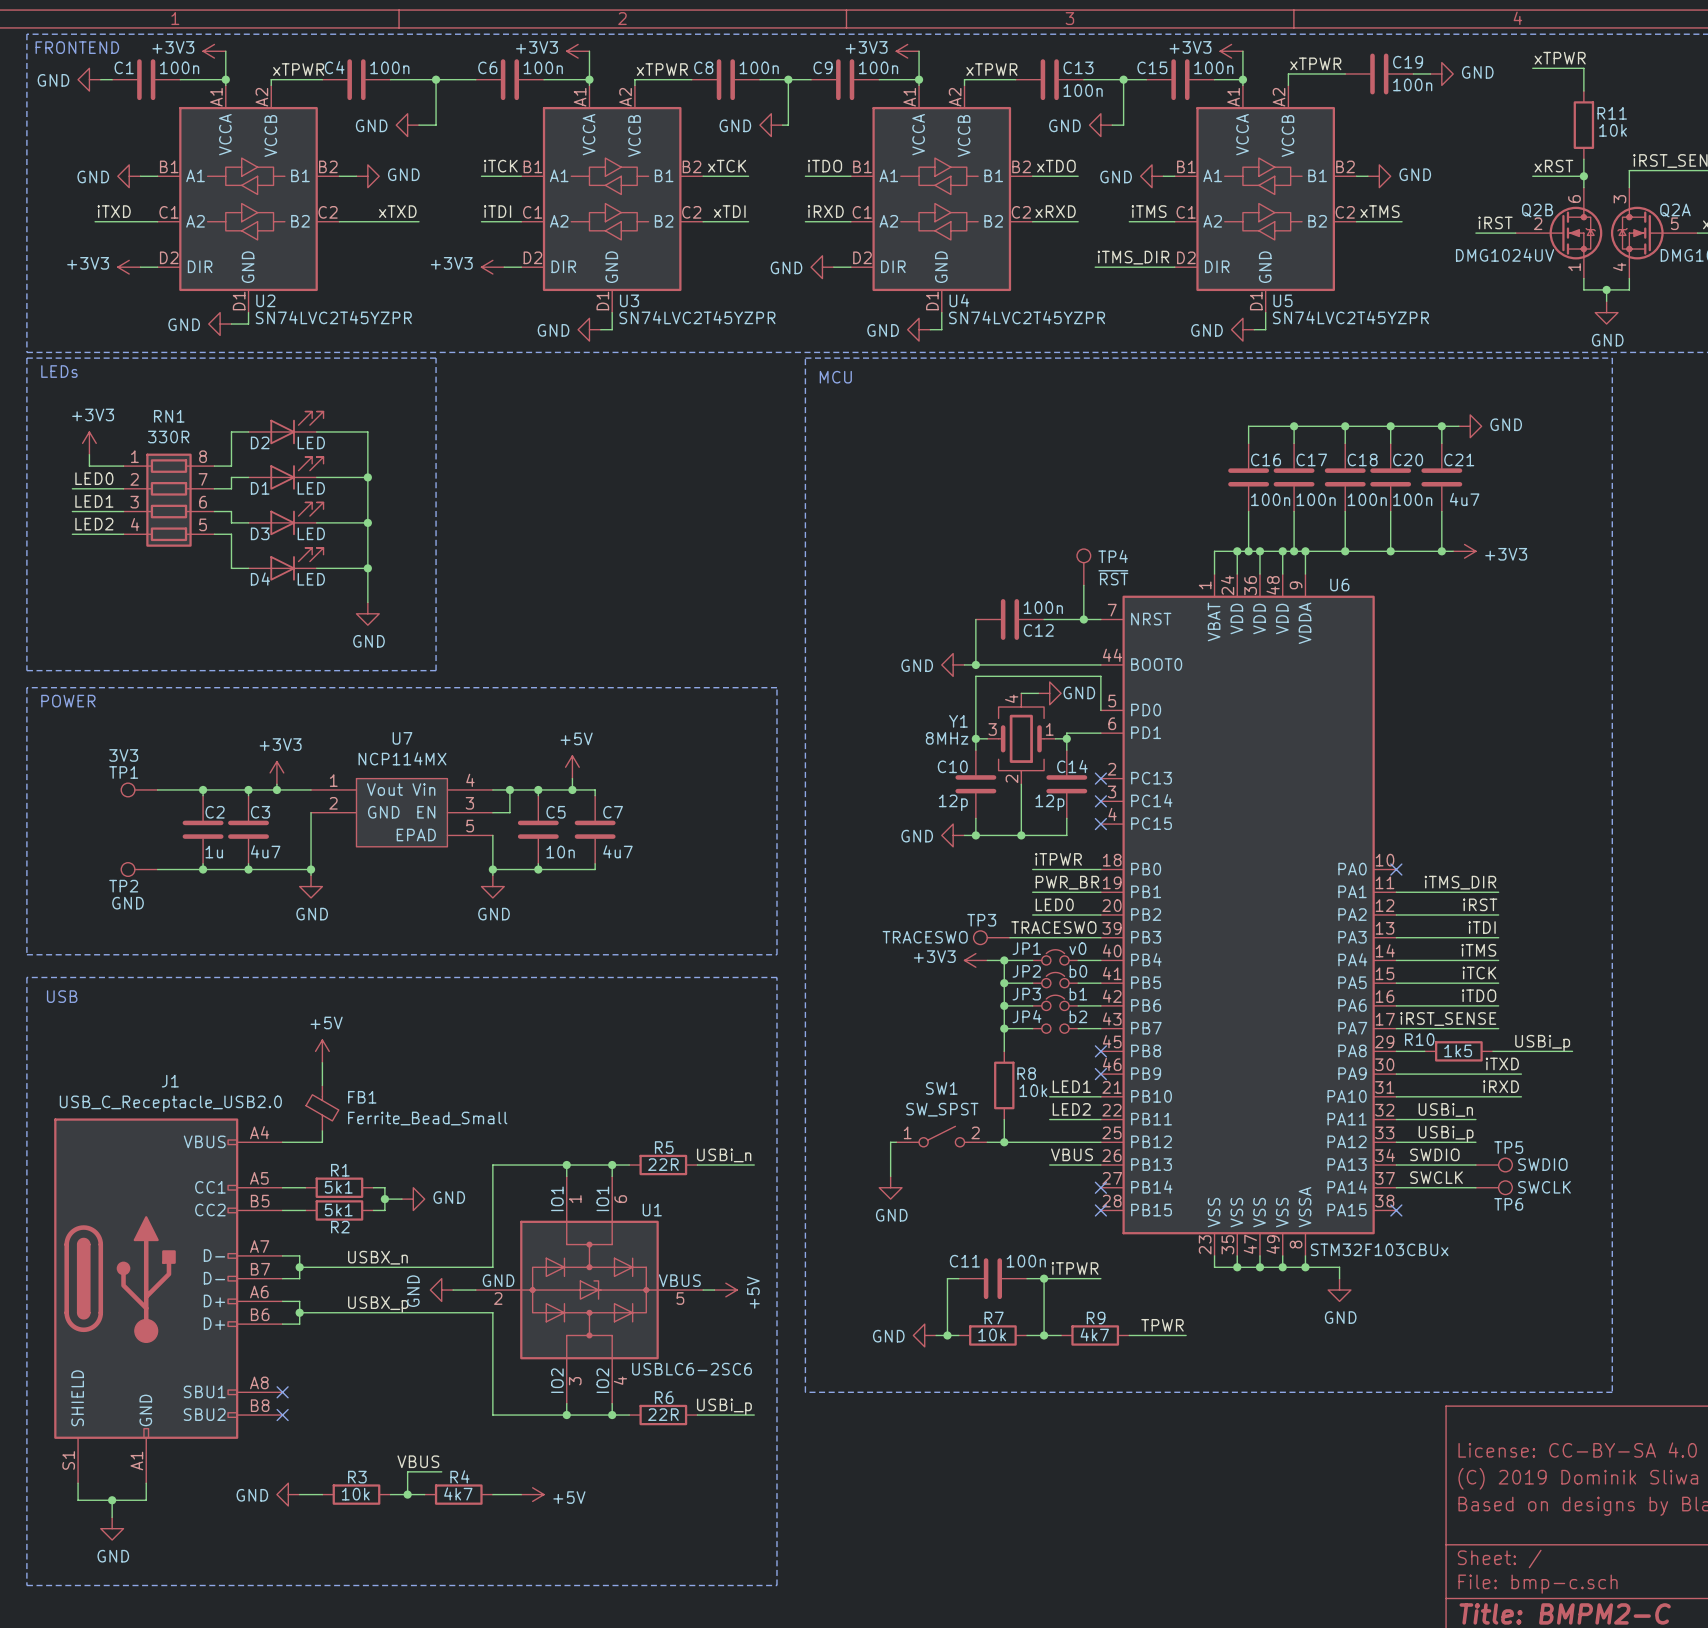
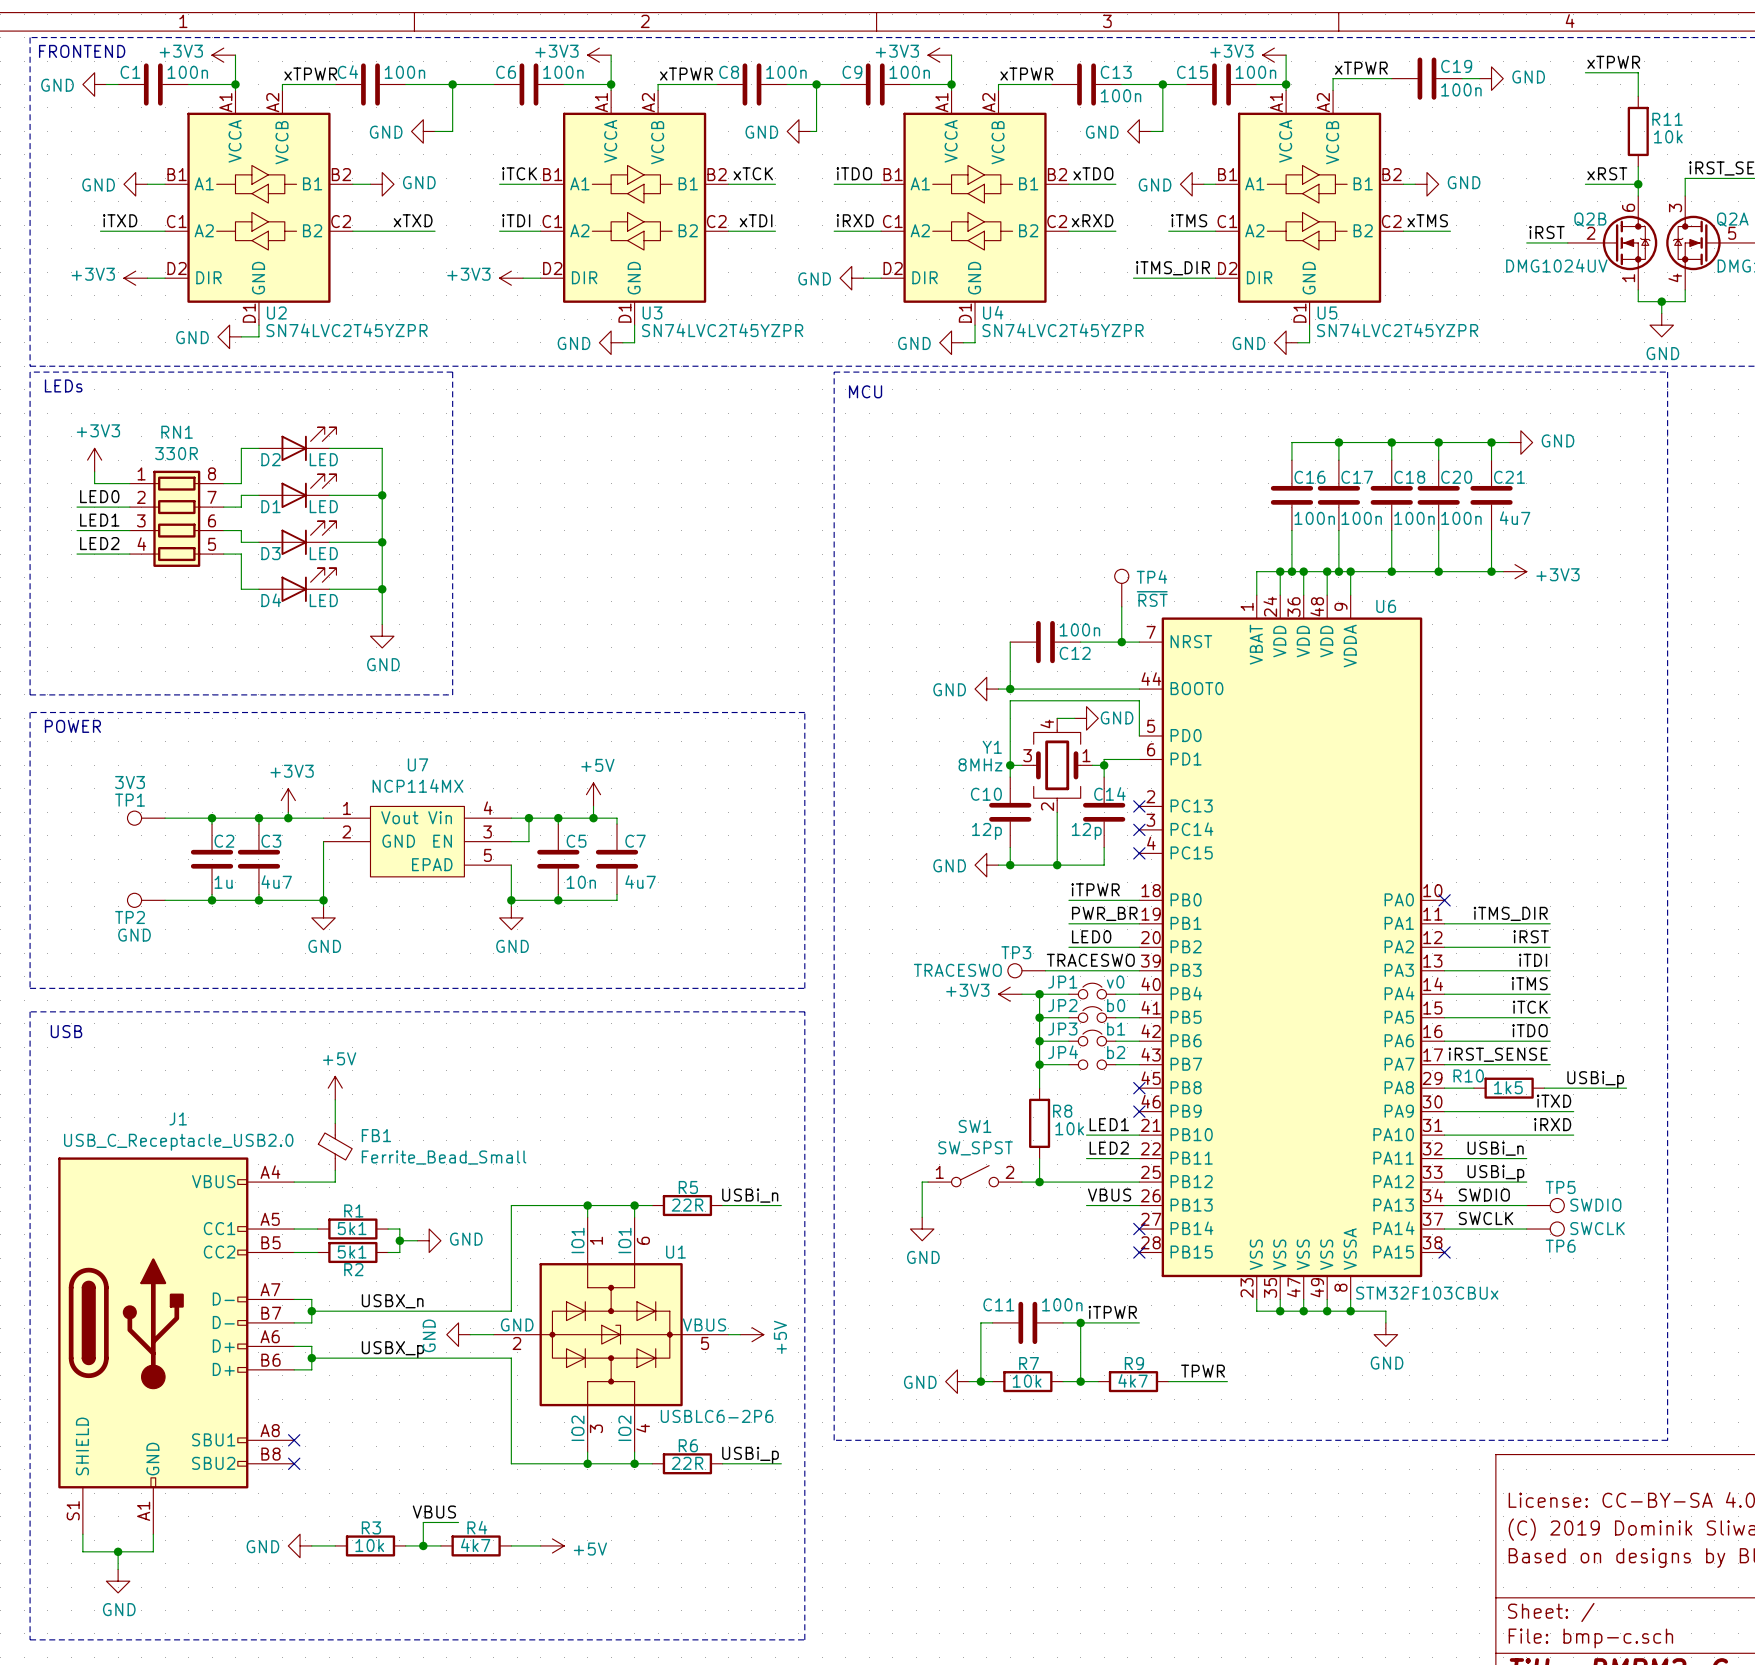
U1 value: USBLC6-2SC6 (692, 1369) -> USBLC6-2P6 (717, 1416)

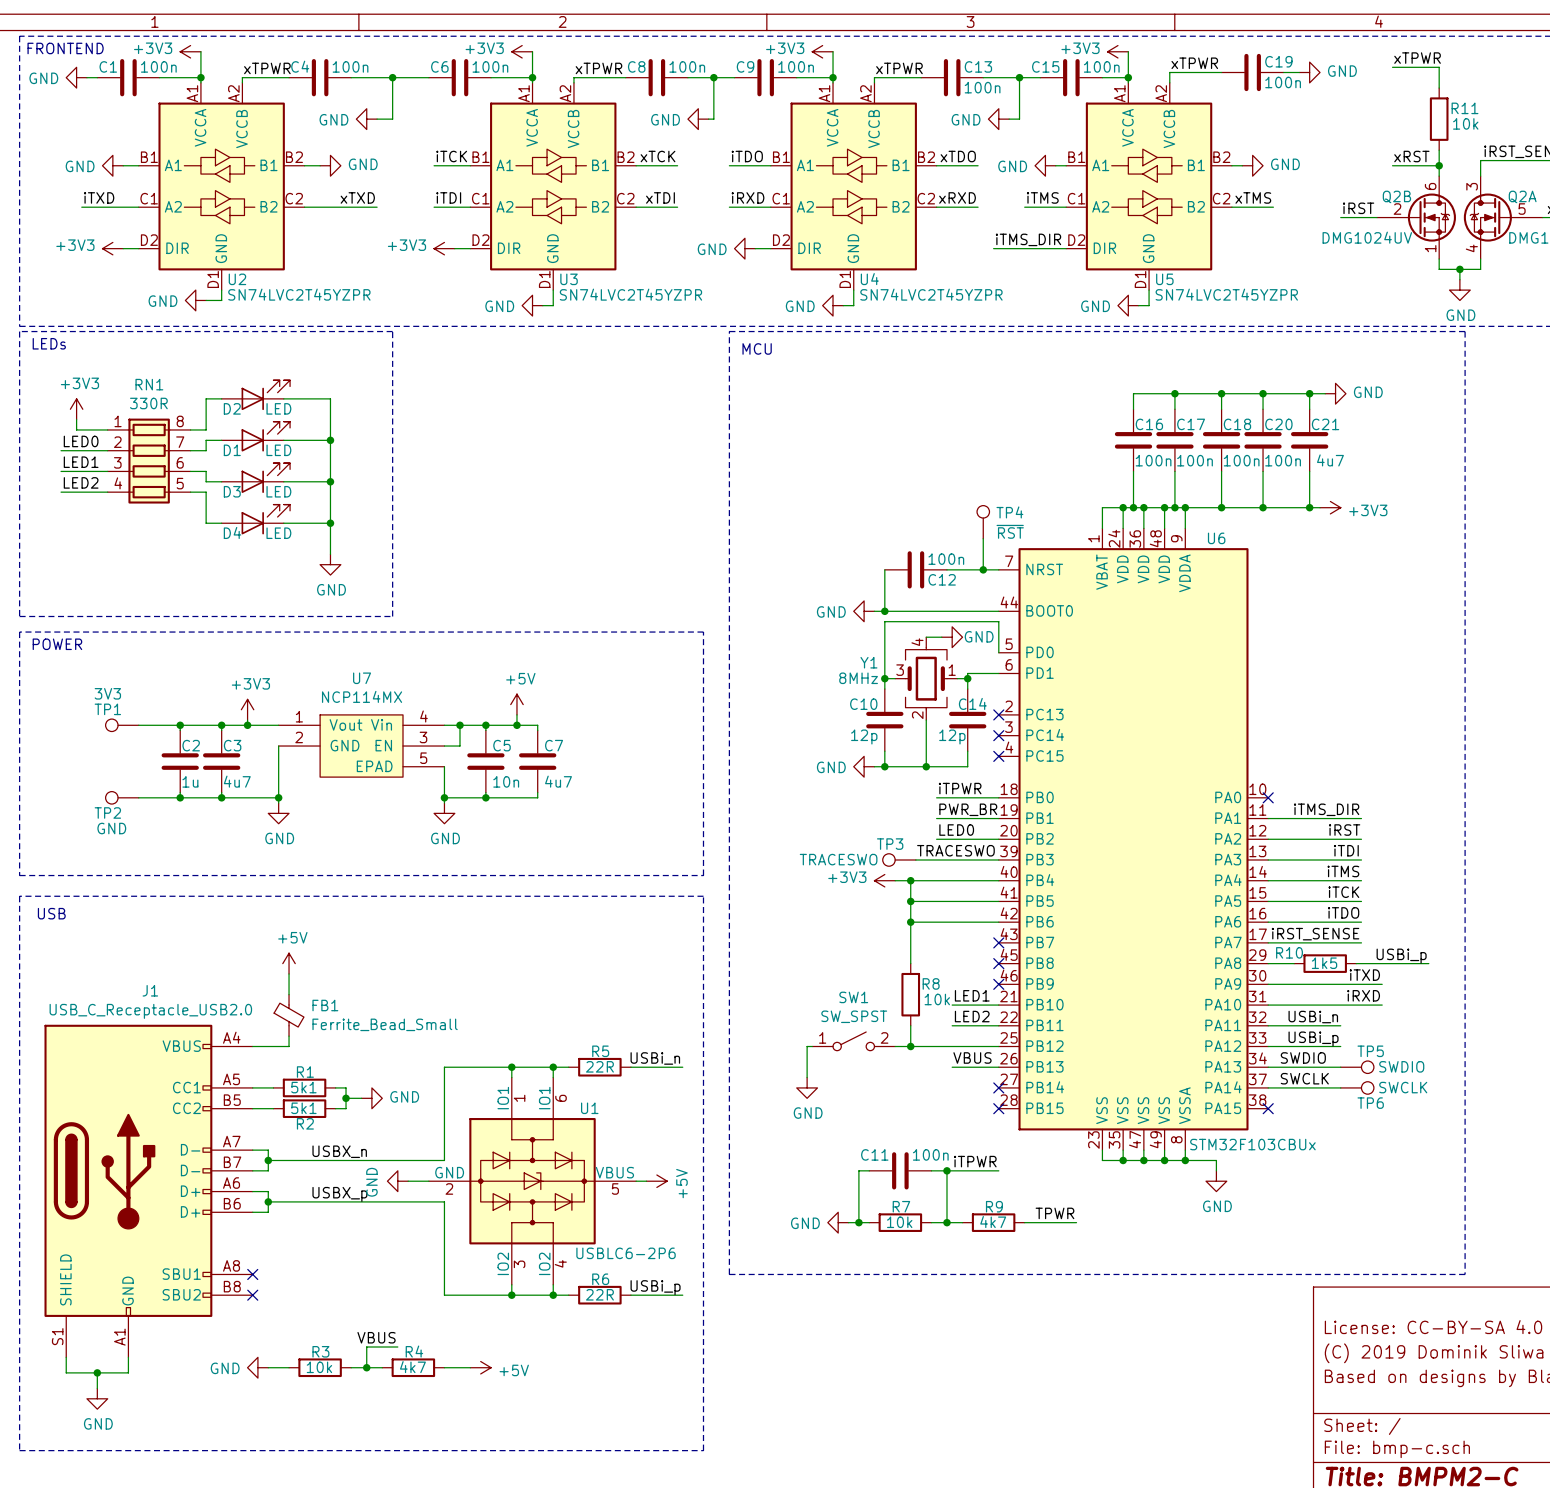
JP1: v0 (1092, 991) -> none
wire: none -> (936, 880) (978, 880)
JP2: b0 (1092, 1014) -> none
wire: none -> (936, 901) (978, 901)
JP3: b1 (1092, 1038) -> none
wire: none -> (936, 922) (978, 922)
wire: (1039, 1064) (1068, 1064) -> none
junction: (1039, 1064) -> none
JP4: b2 (1092, 1064) -> none
wire: (1115, 1064) (1139, 1064) -> none
no-connect mark: none -> (998, 942)

